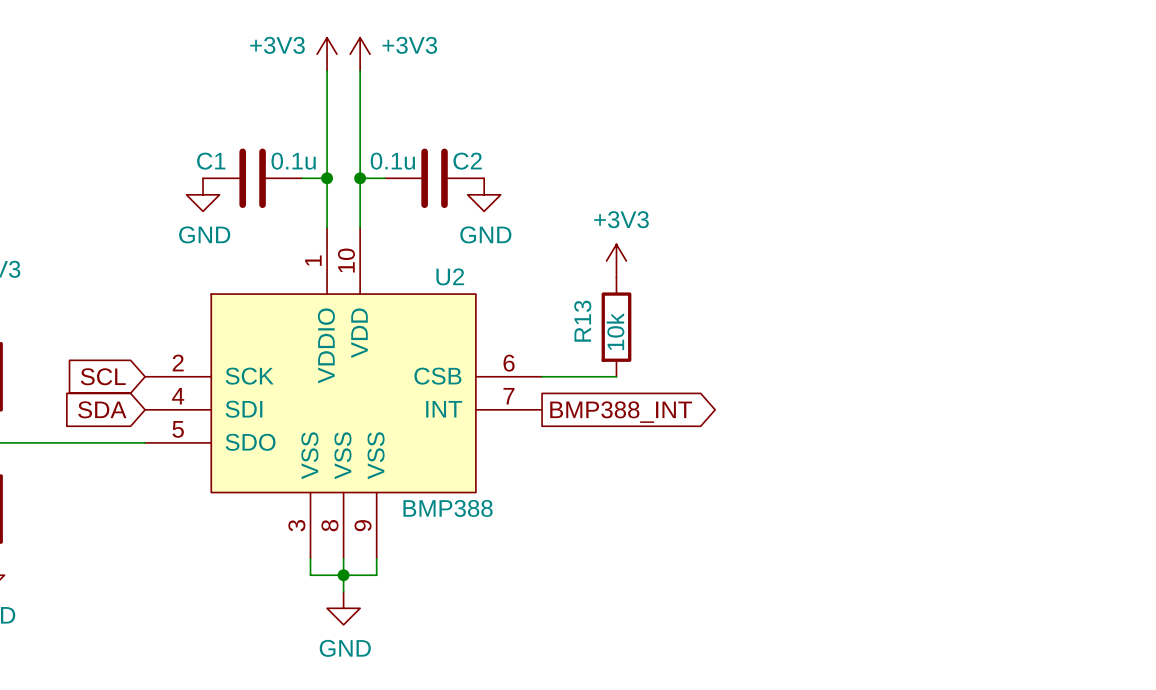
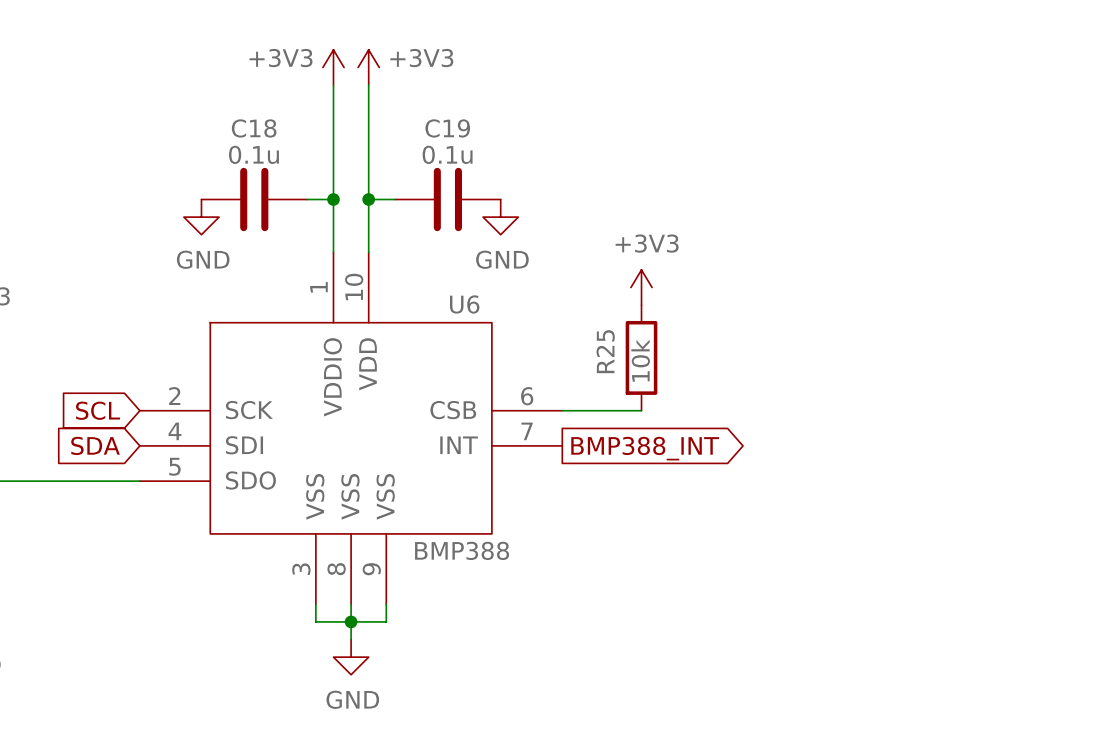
C1 name: C1 (211, 161) -> C18 (254, 128)
C1 value position: 0.1u (293, 161) -> 0.1u (253, 154)
C2 value position: 0.1u (392, 161) -> 0.1u (447, 154)
C2 name: C2 (467, 161) -> C19 (447, 128)
U2 name: U2 (450, 276) -> U6 (464, 304)
R13 name: R13 (582, 321) -> R25 (605, 351)

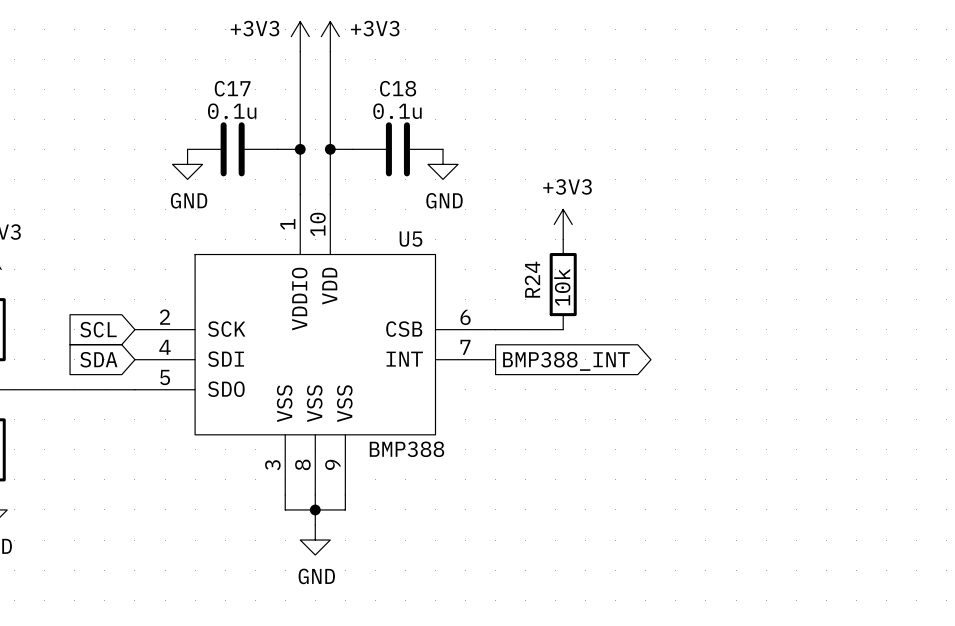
C18 name: C18 (254, 128) -> C17 (232, 88)
C19 name: C19 (447, 128) -> C18 (398, 88)
U6 name: U6 (464, 304) -> U5 (410, 239)
R25 name: R25 (605, 351) -> R24 (532, 279)

